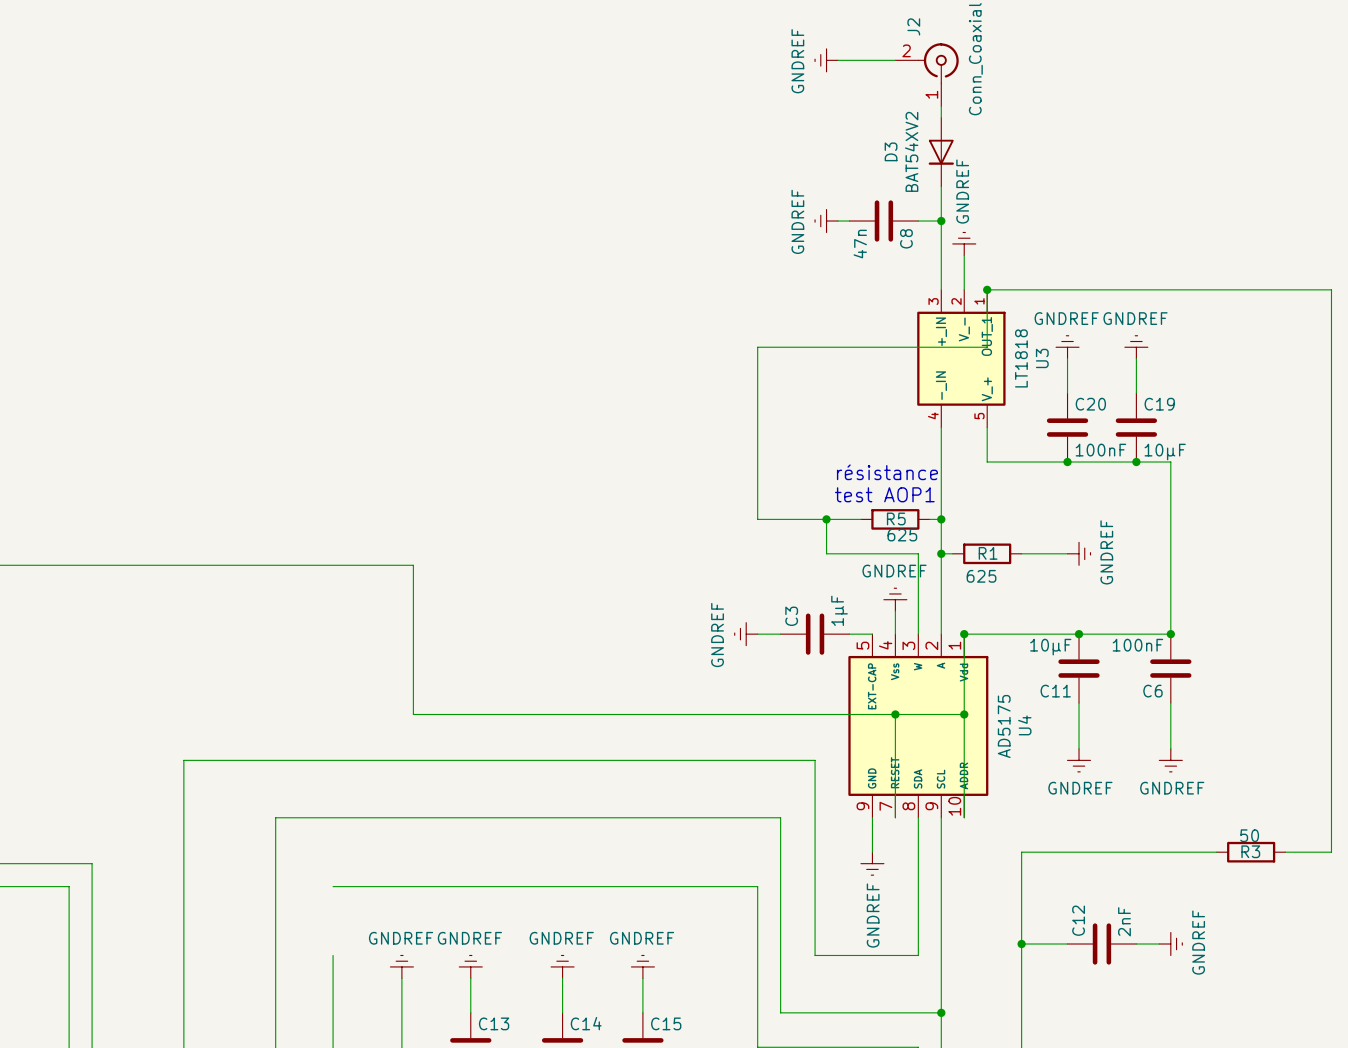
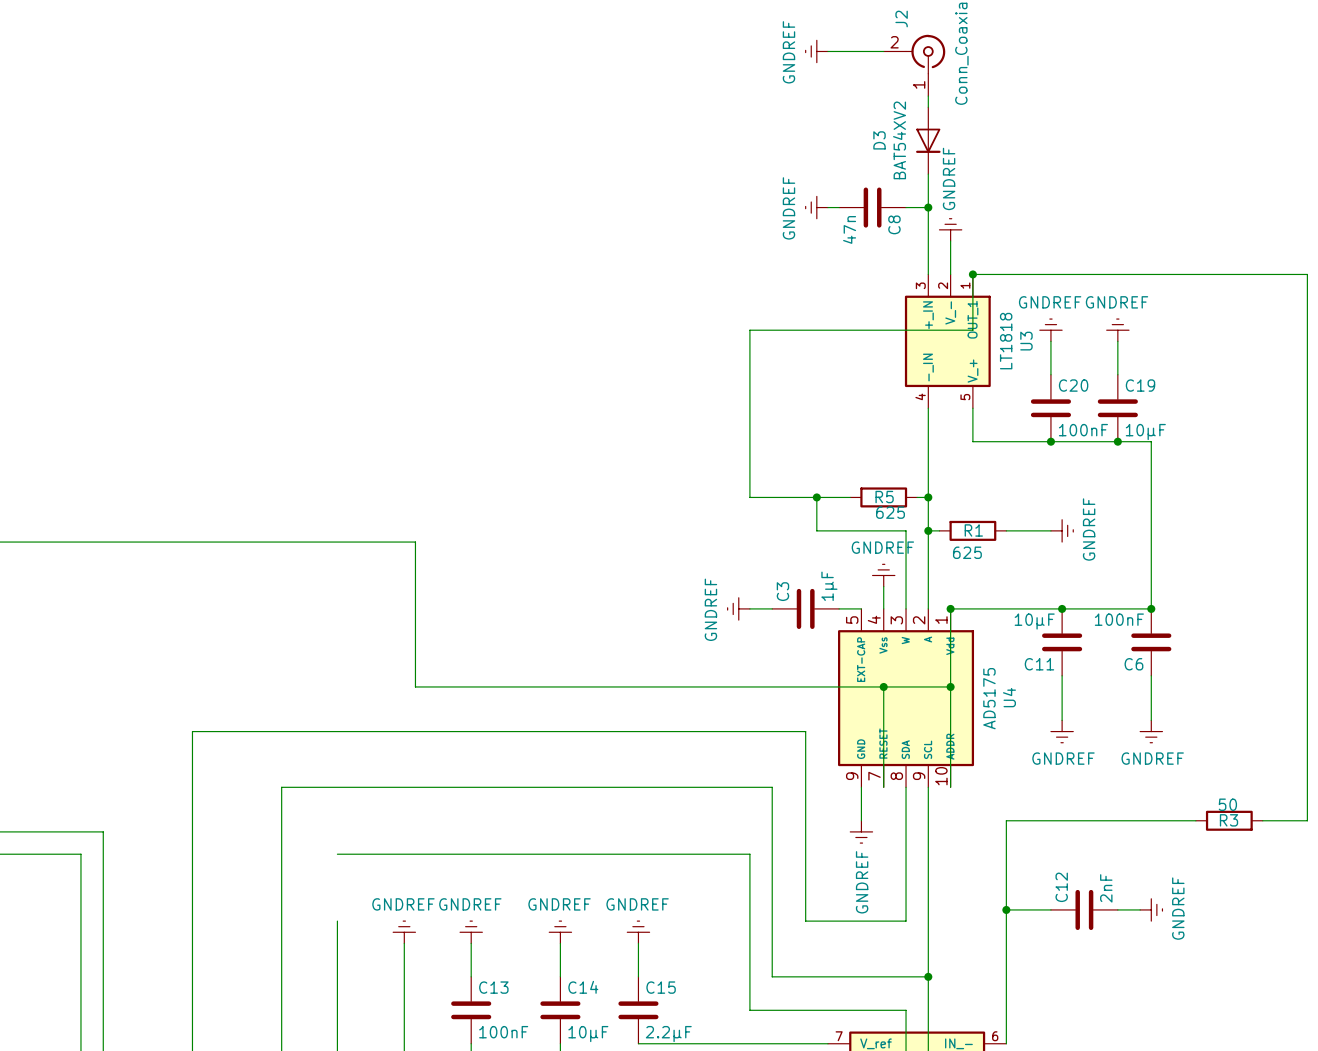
text: résistance (887, 472) -> none
text: test AOP1 (884, 494) -> none

